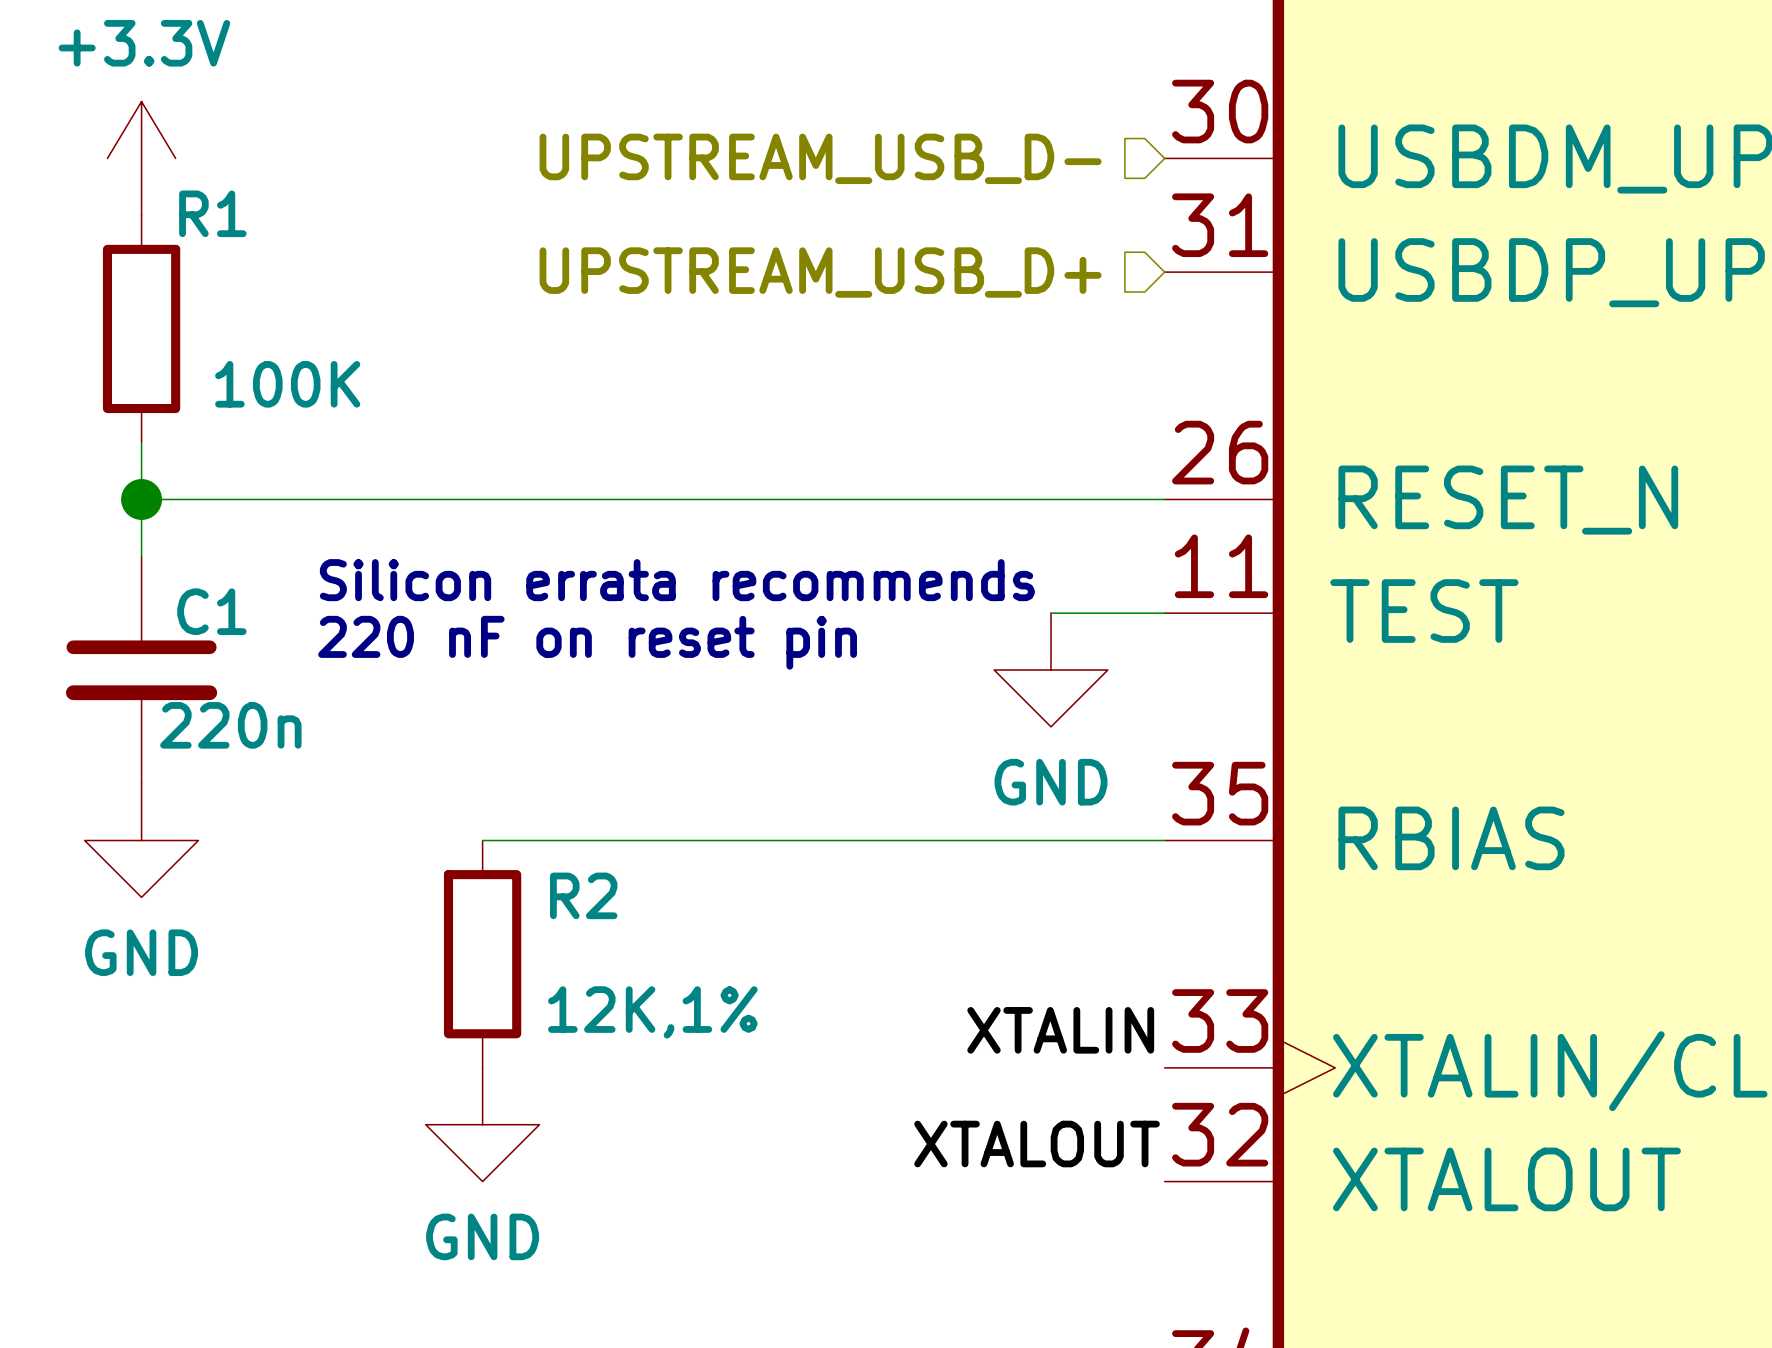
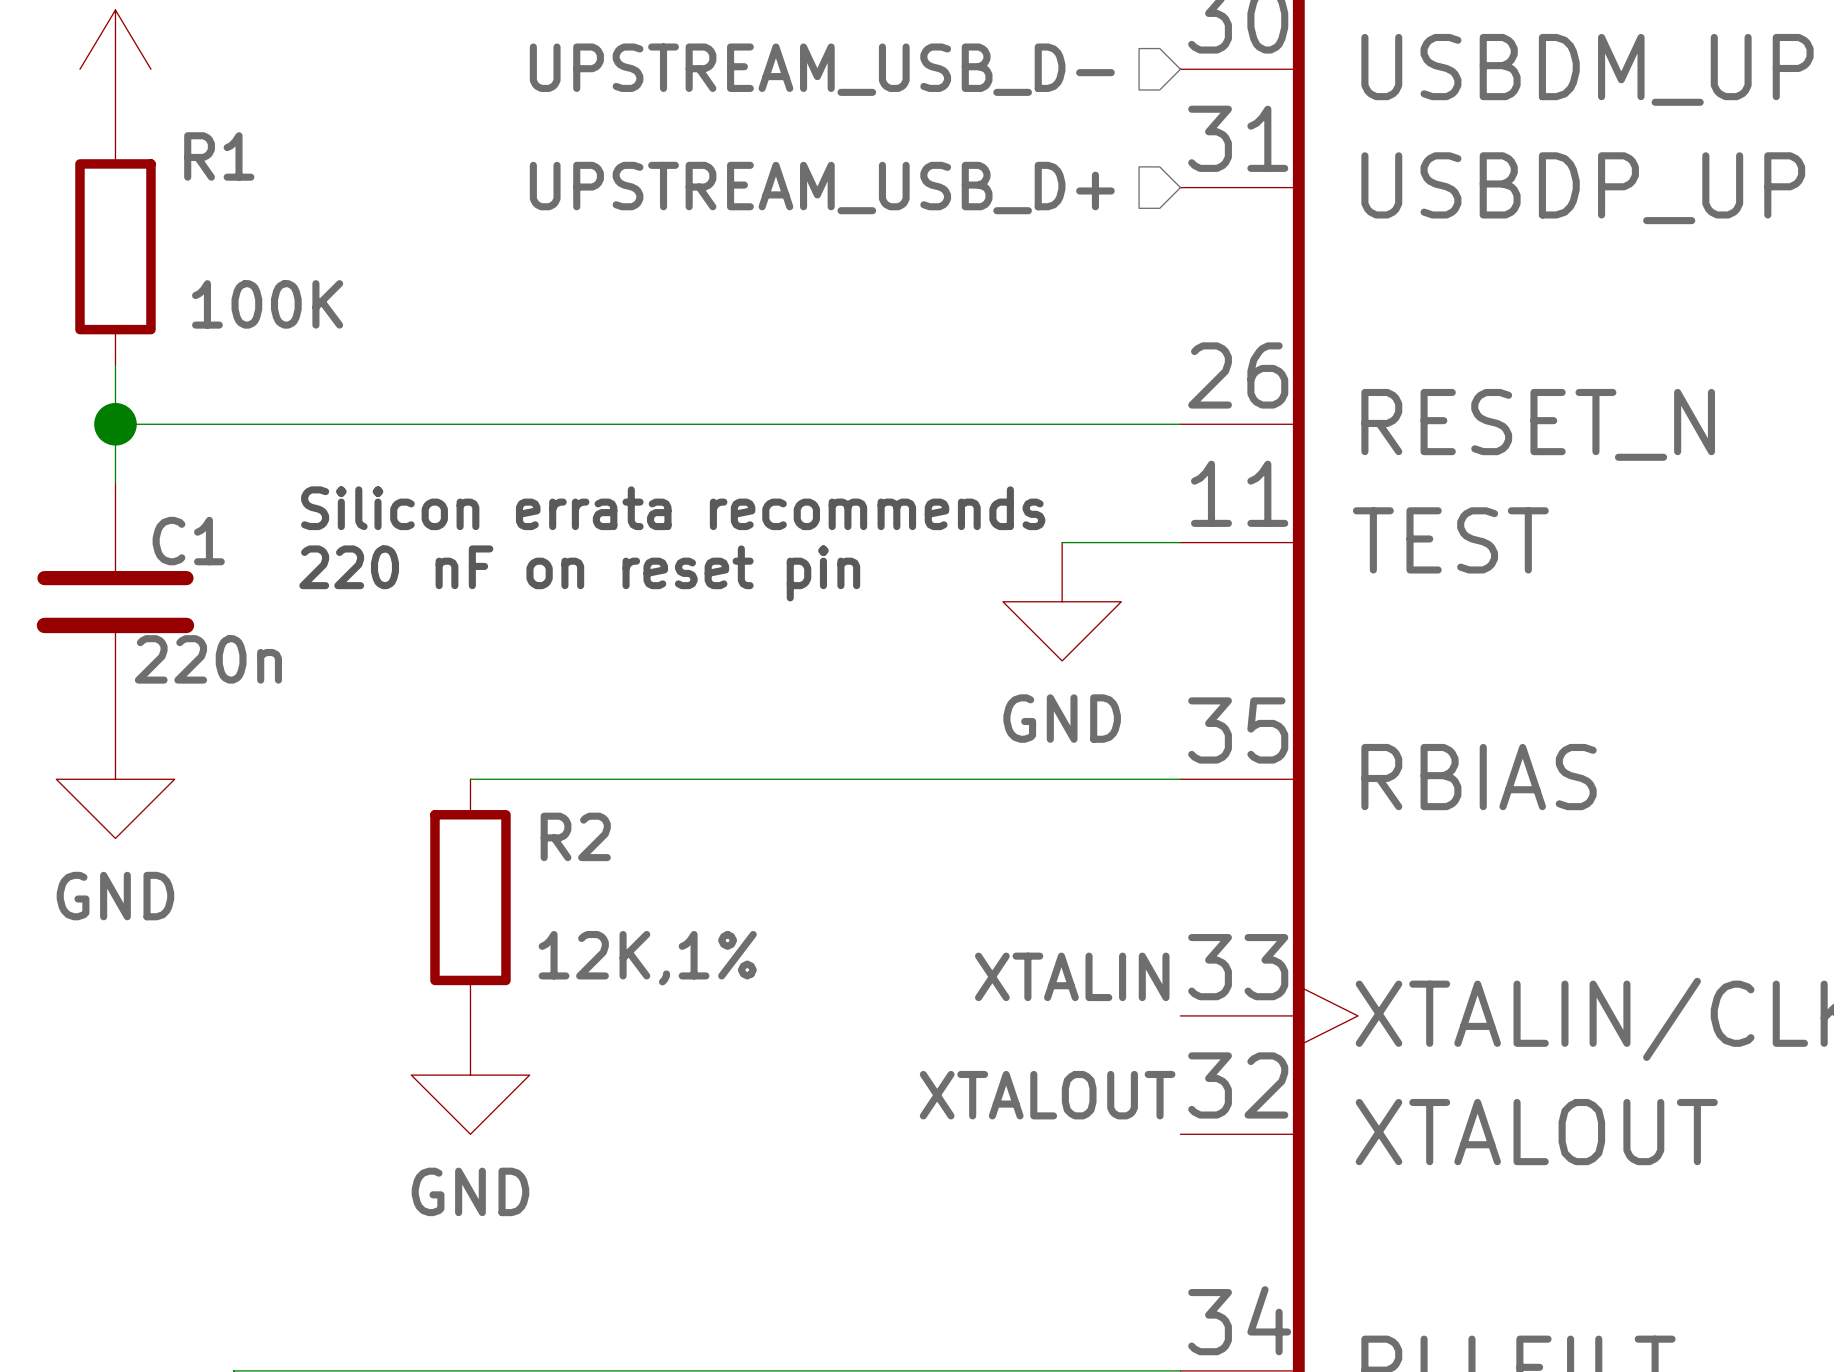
R1 name position: R1 (212, 213) -> R1 (219, 156)

